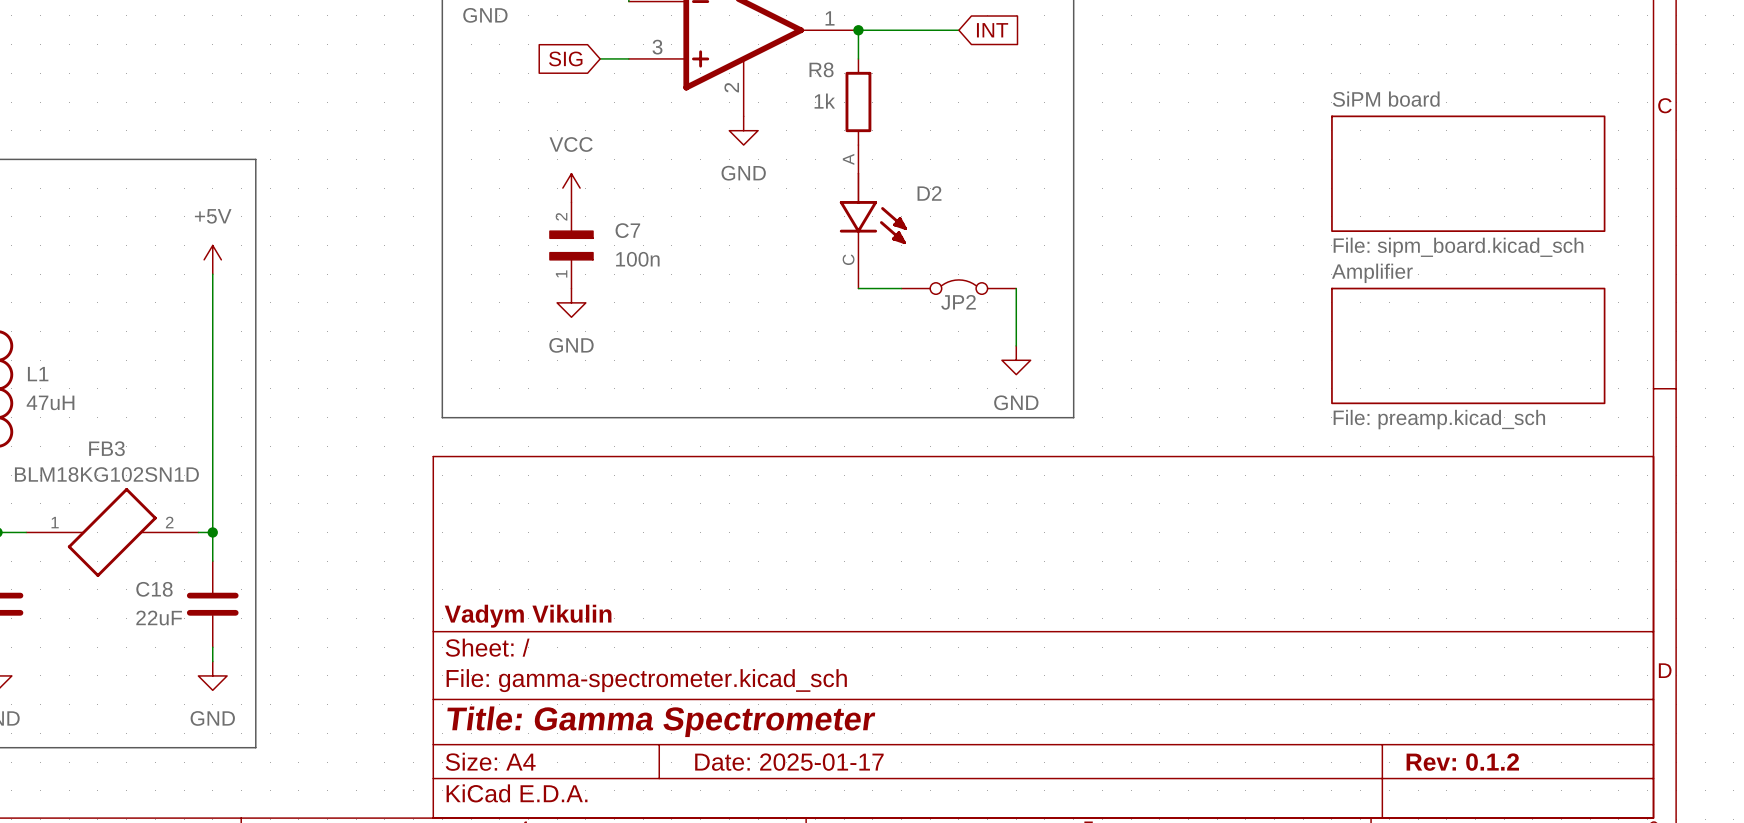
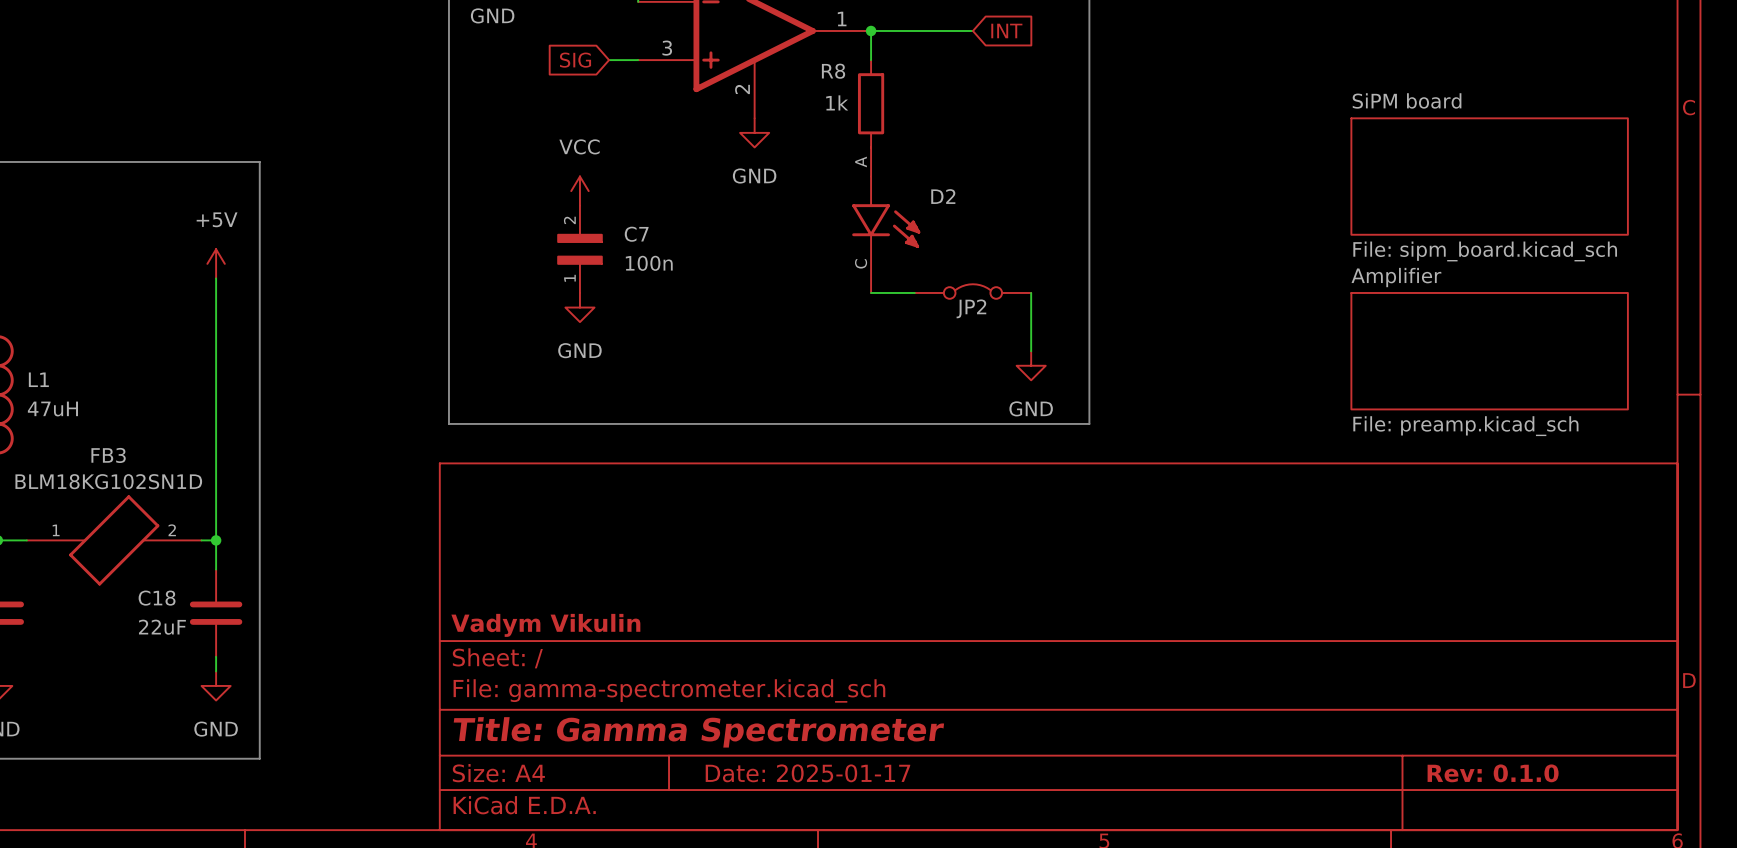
title block: Rev: 0.1.2 (1462, 762) -> Rev: 0.1.0 (1493, 773)

